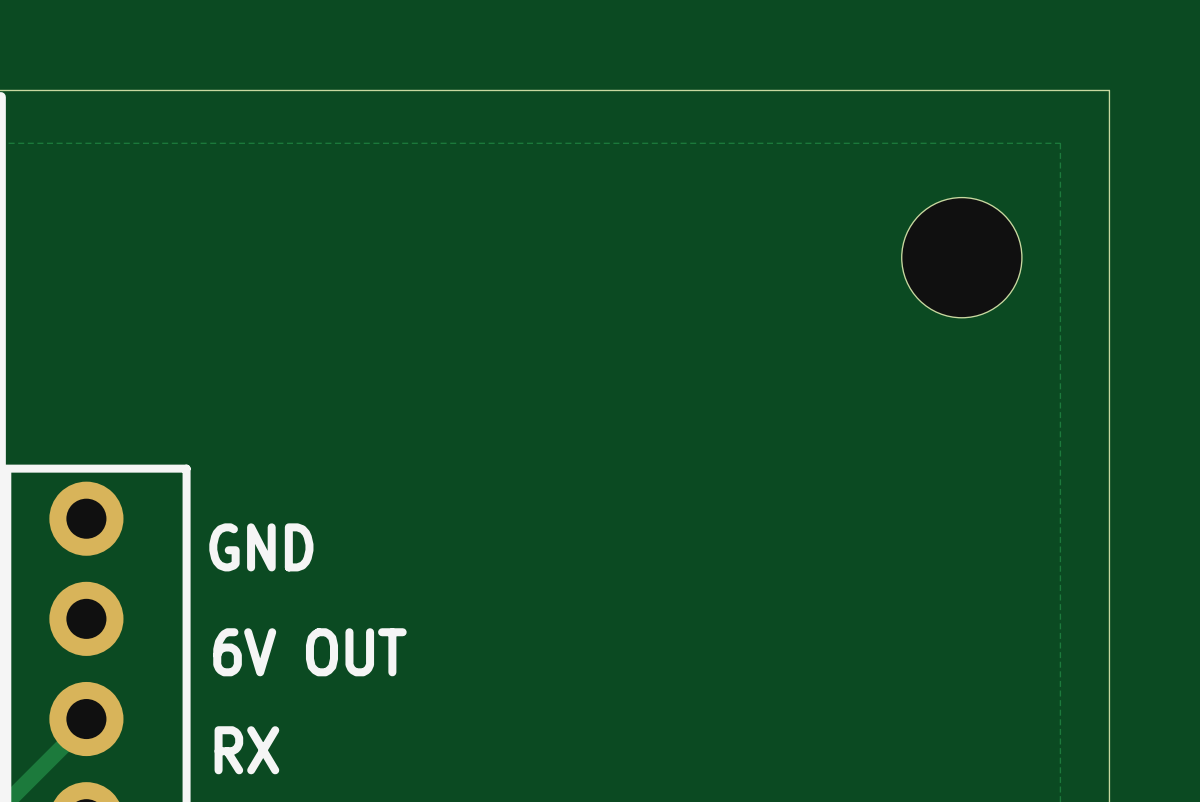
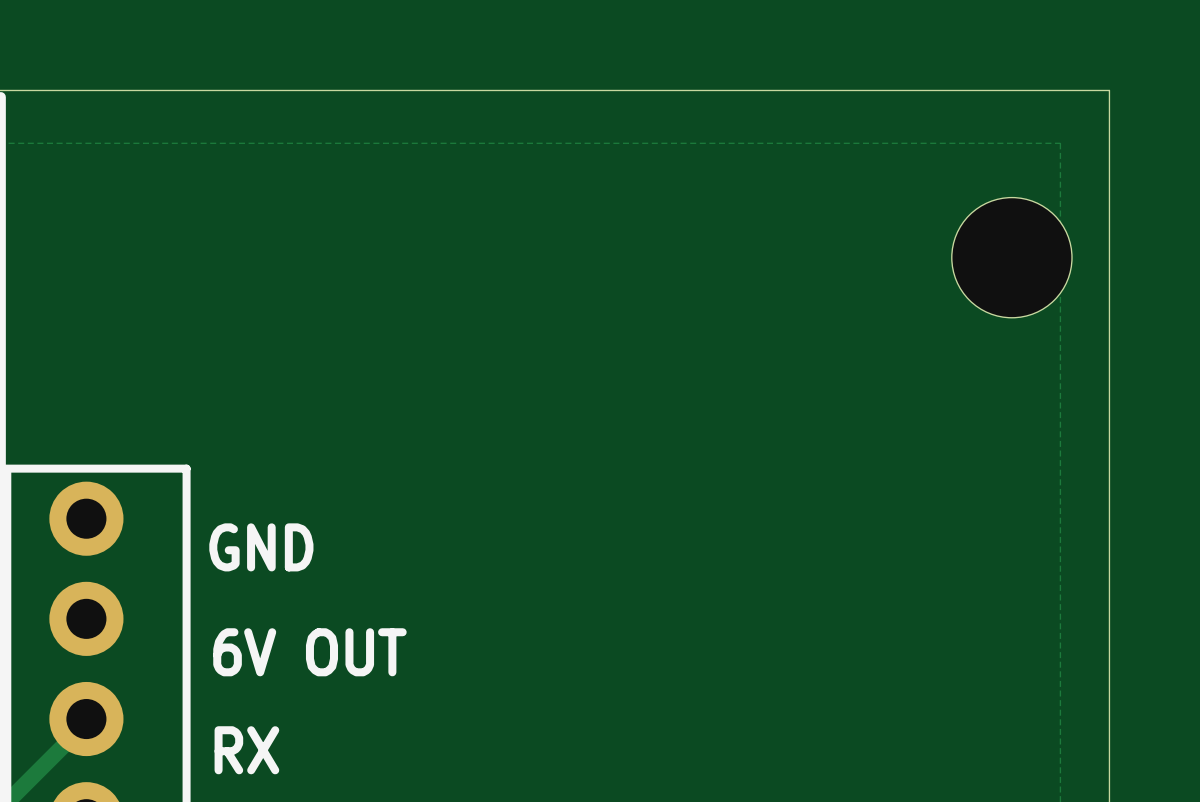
part position: (961, 257) -> (1011, 257)

